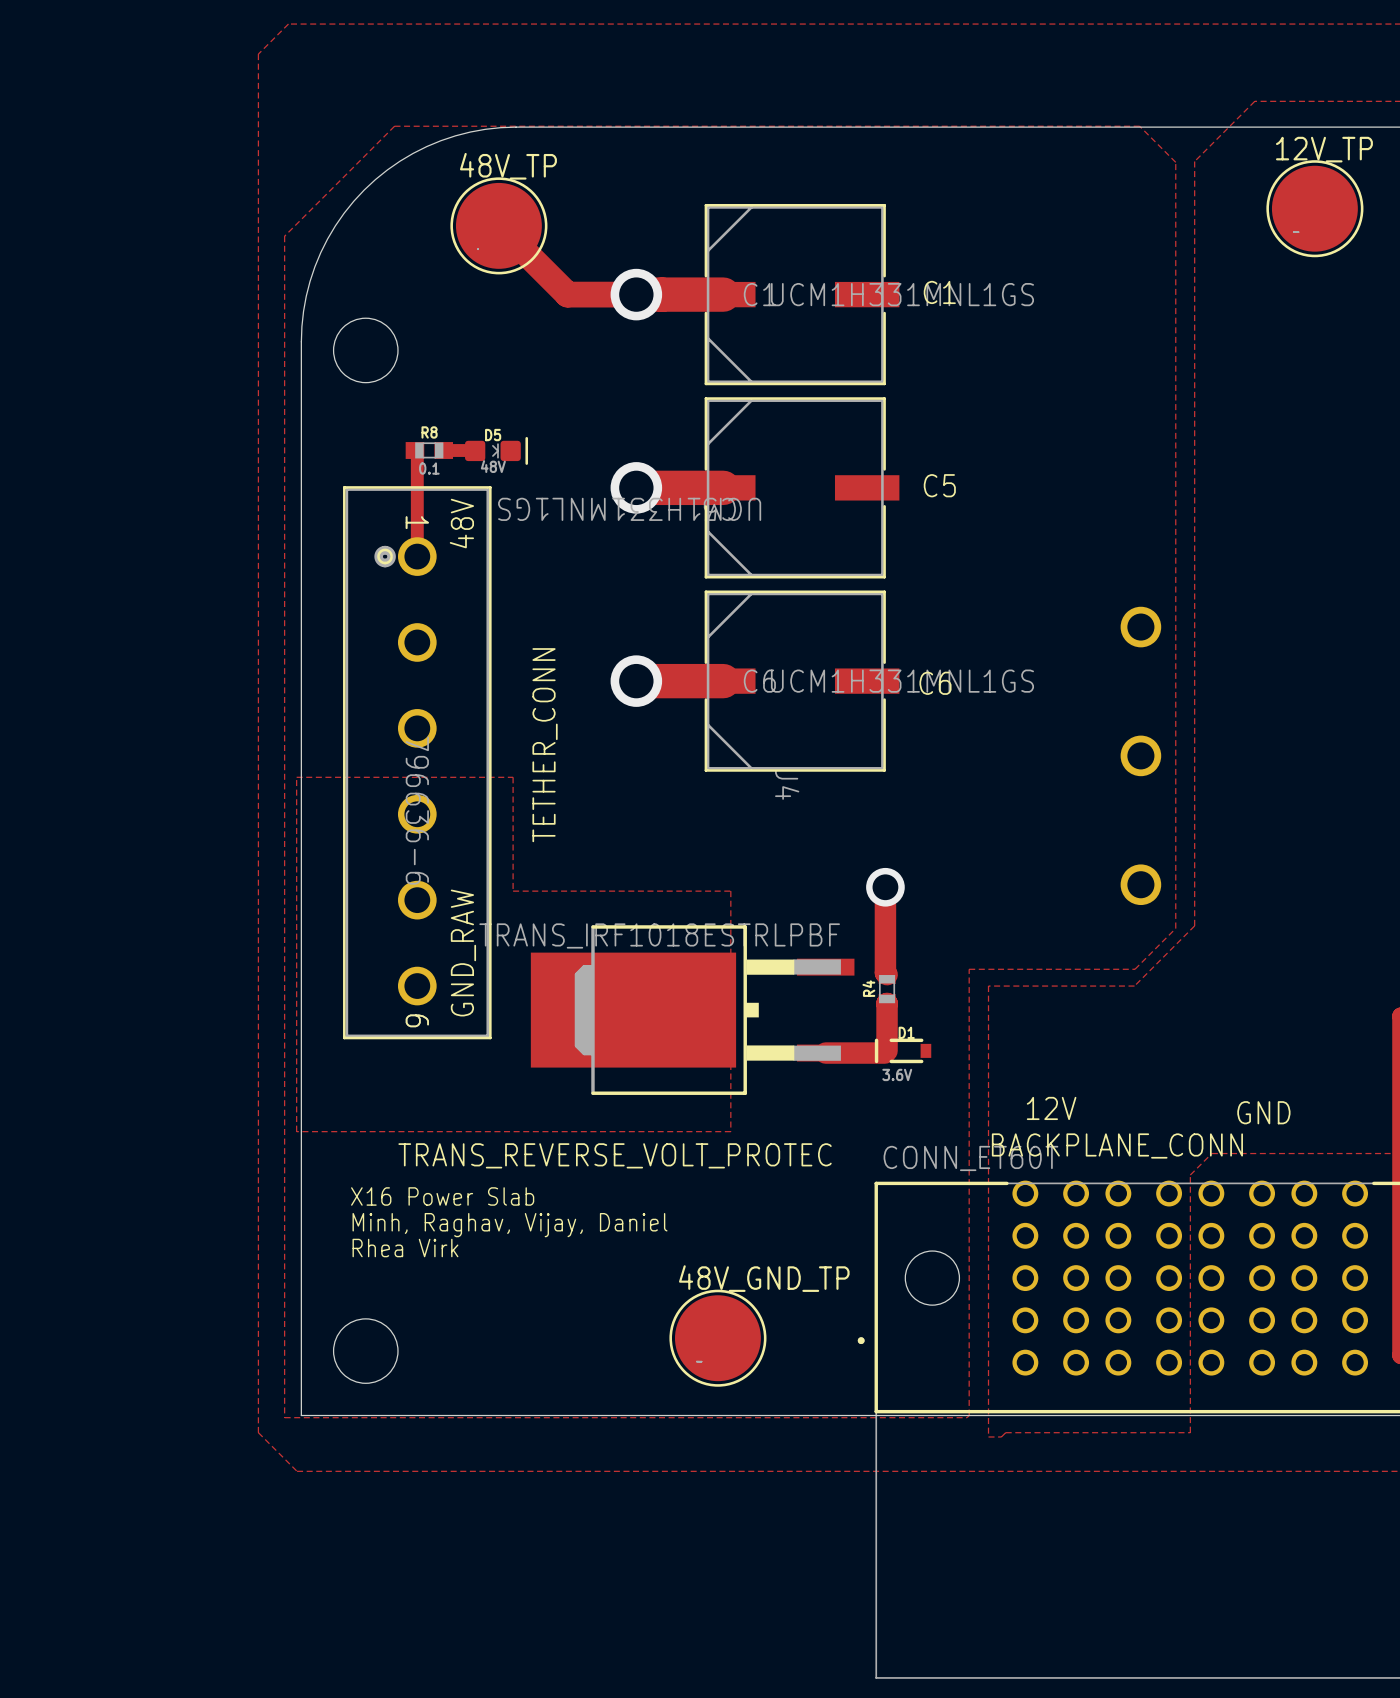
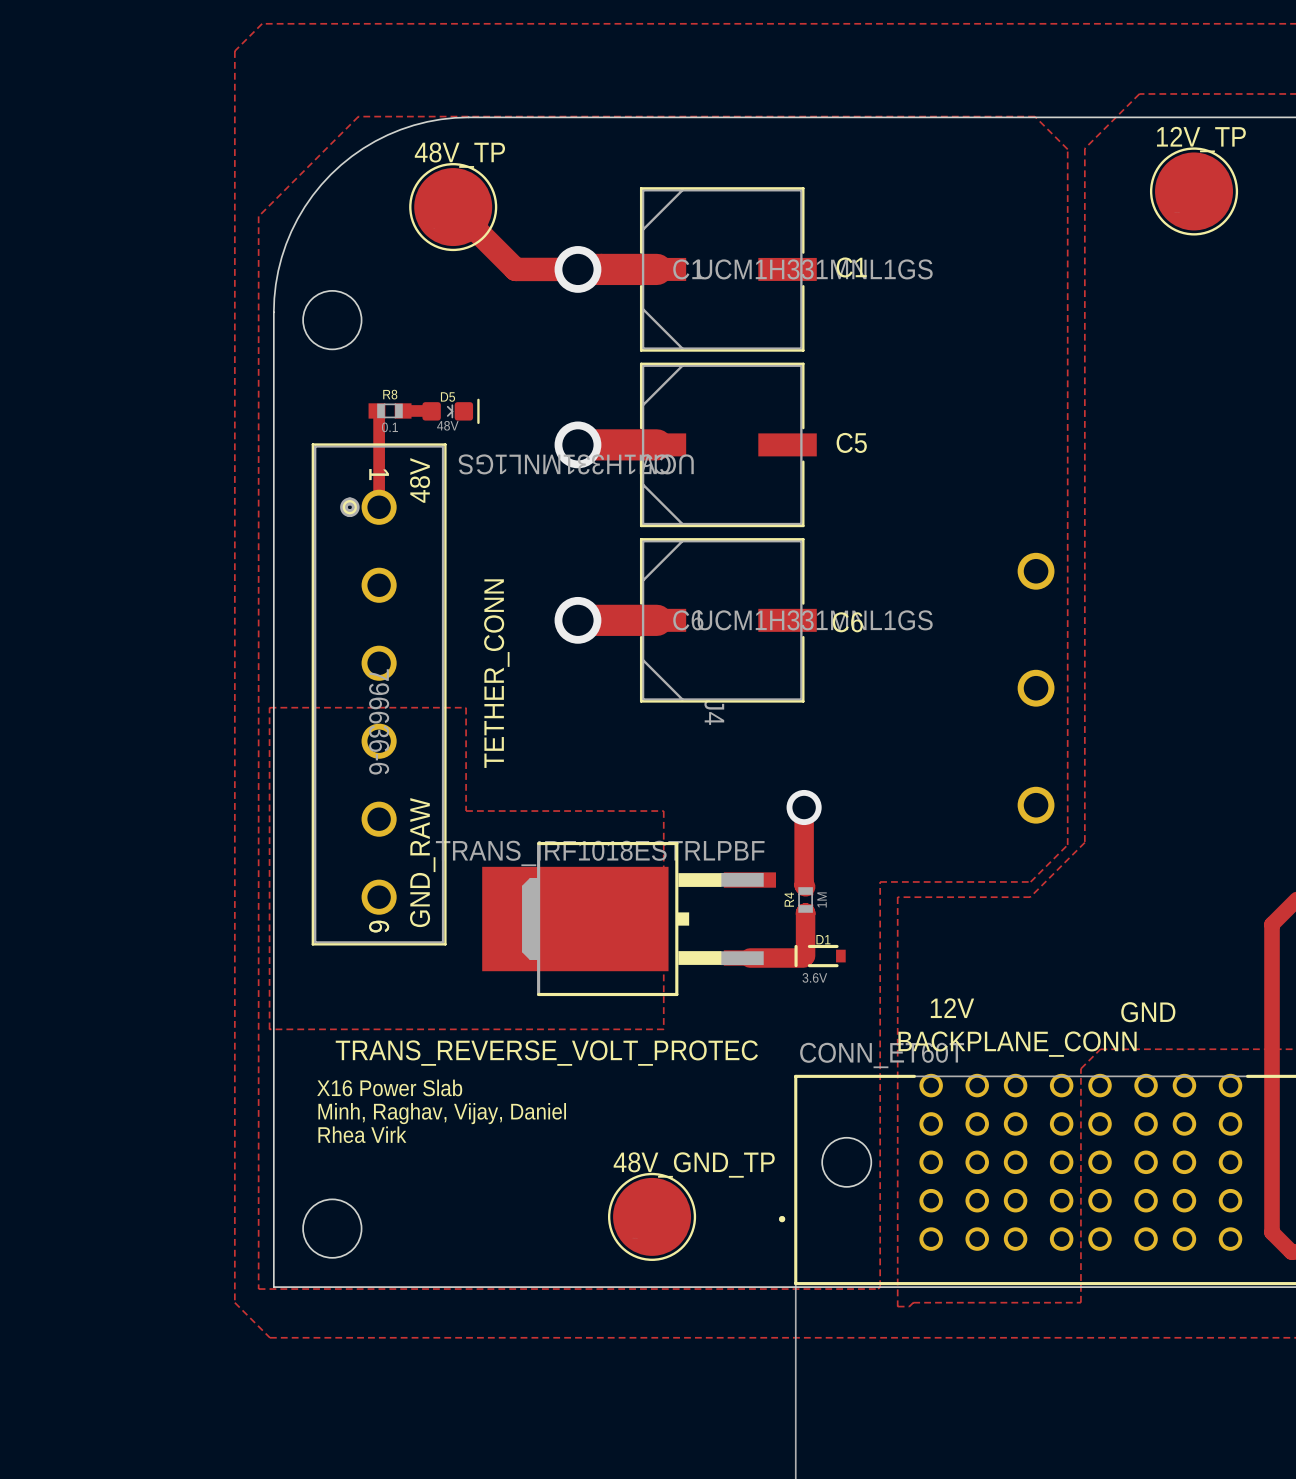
R4 value: none -> 1M (822, 899)

